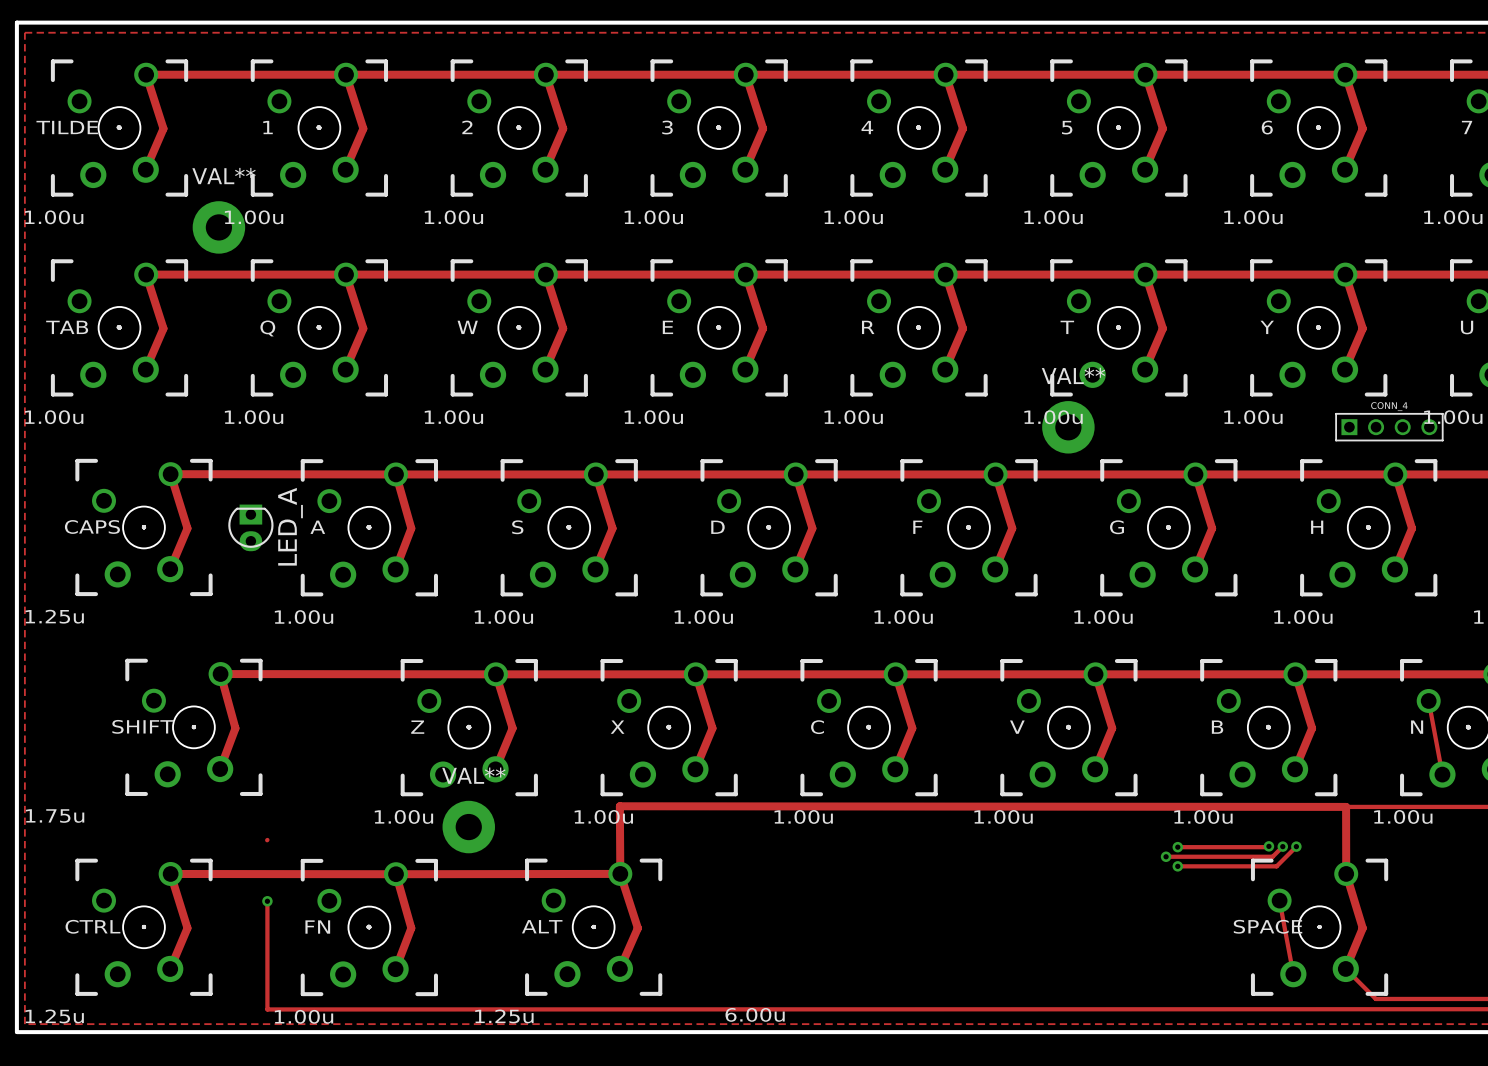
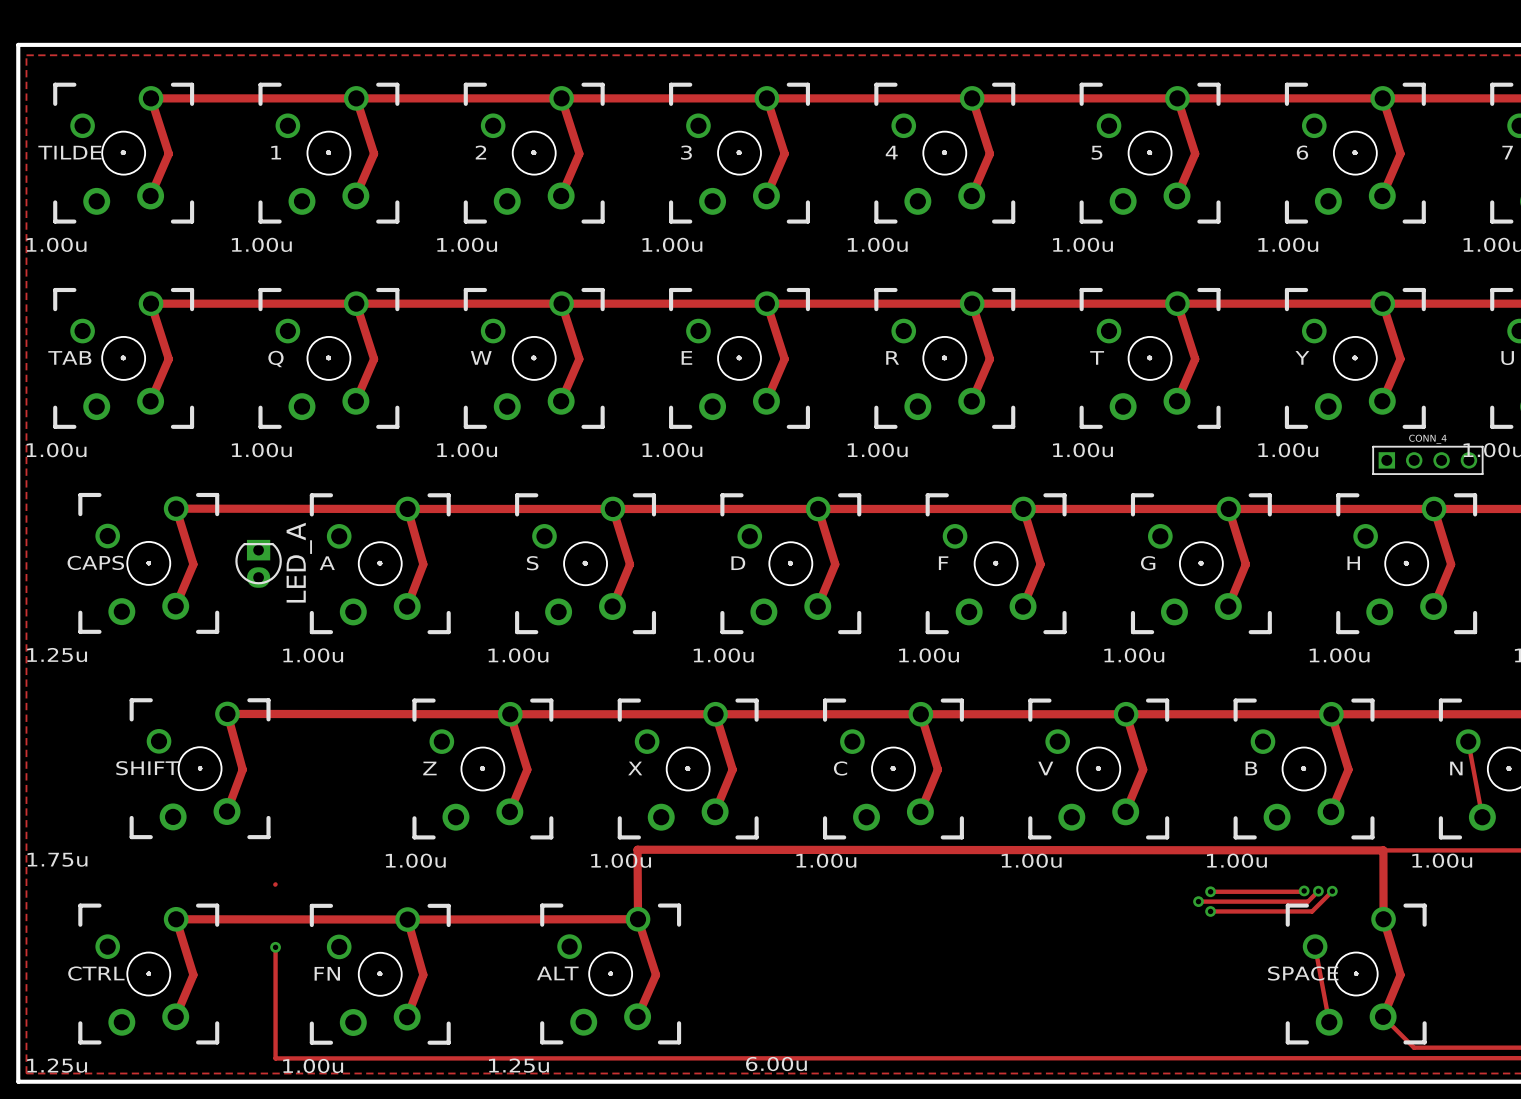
part: VAL** (218, 227) -> none
part: VAL** (1068, 427) -> none
part: VAL** (468, 827) -> none

